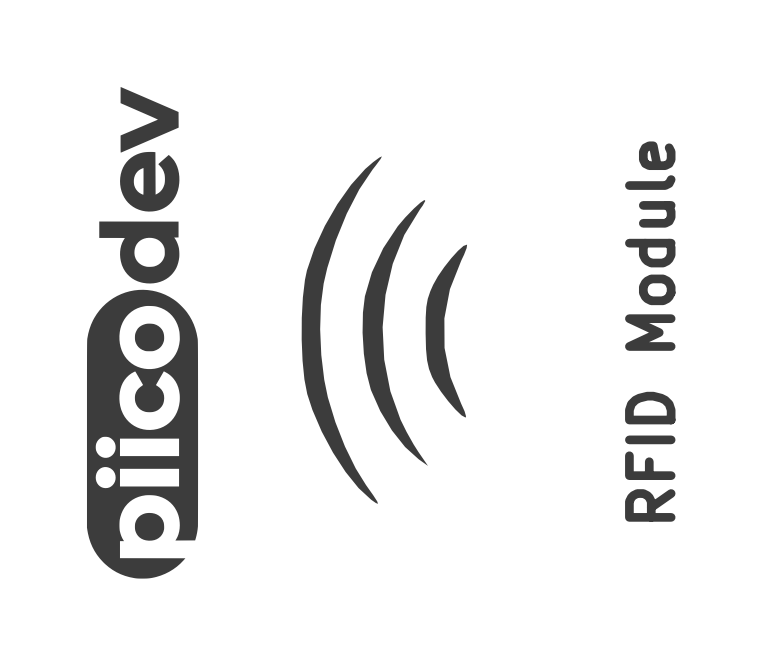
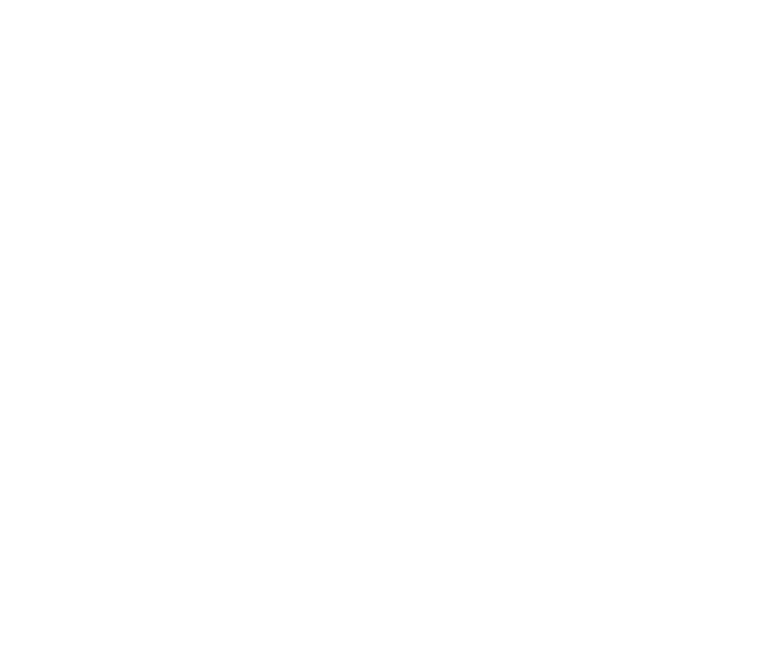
drawing: [86, 86, 199, 579] -> none
drawing: [301, 156, 468, 504] -> none
text: RFID Module (650, 331) -> none

